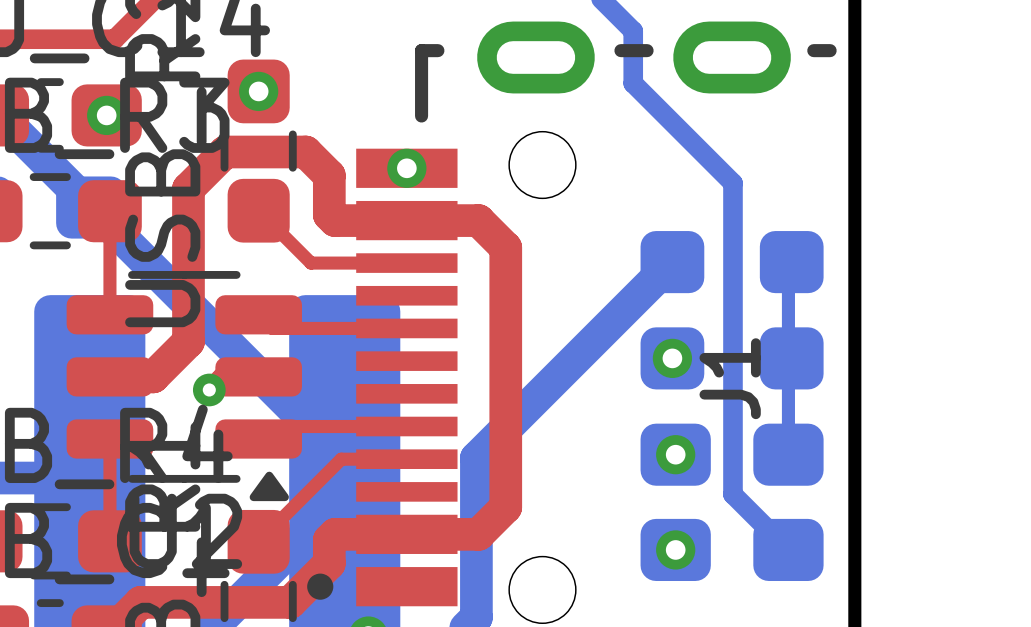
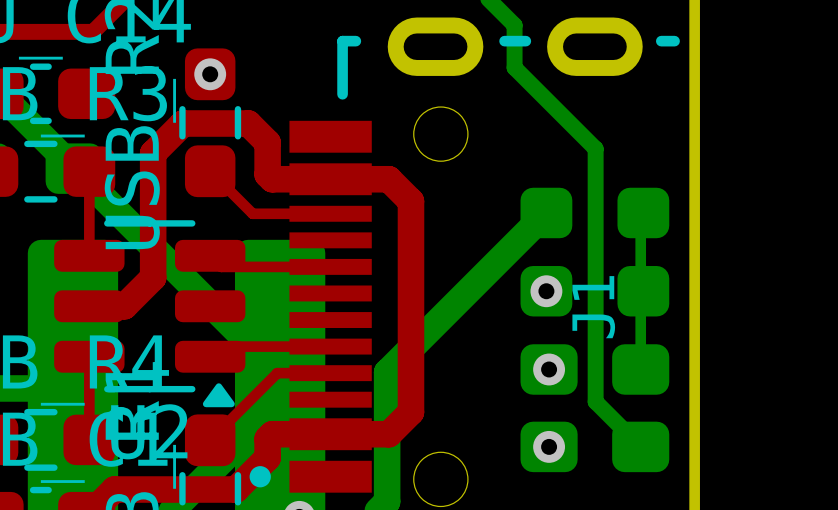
via: (106, 115) -> none
via: (406, 168) -> none
via: (209, 389) -> none

